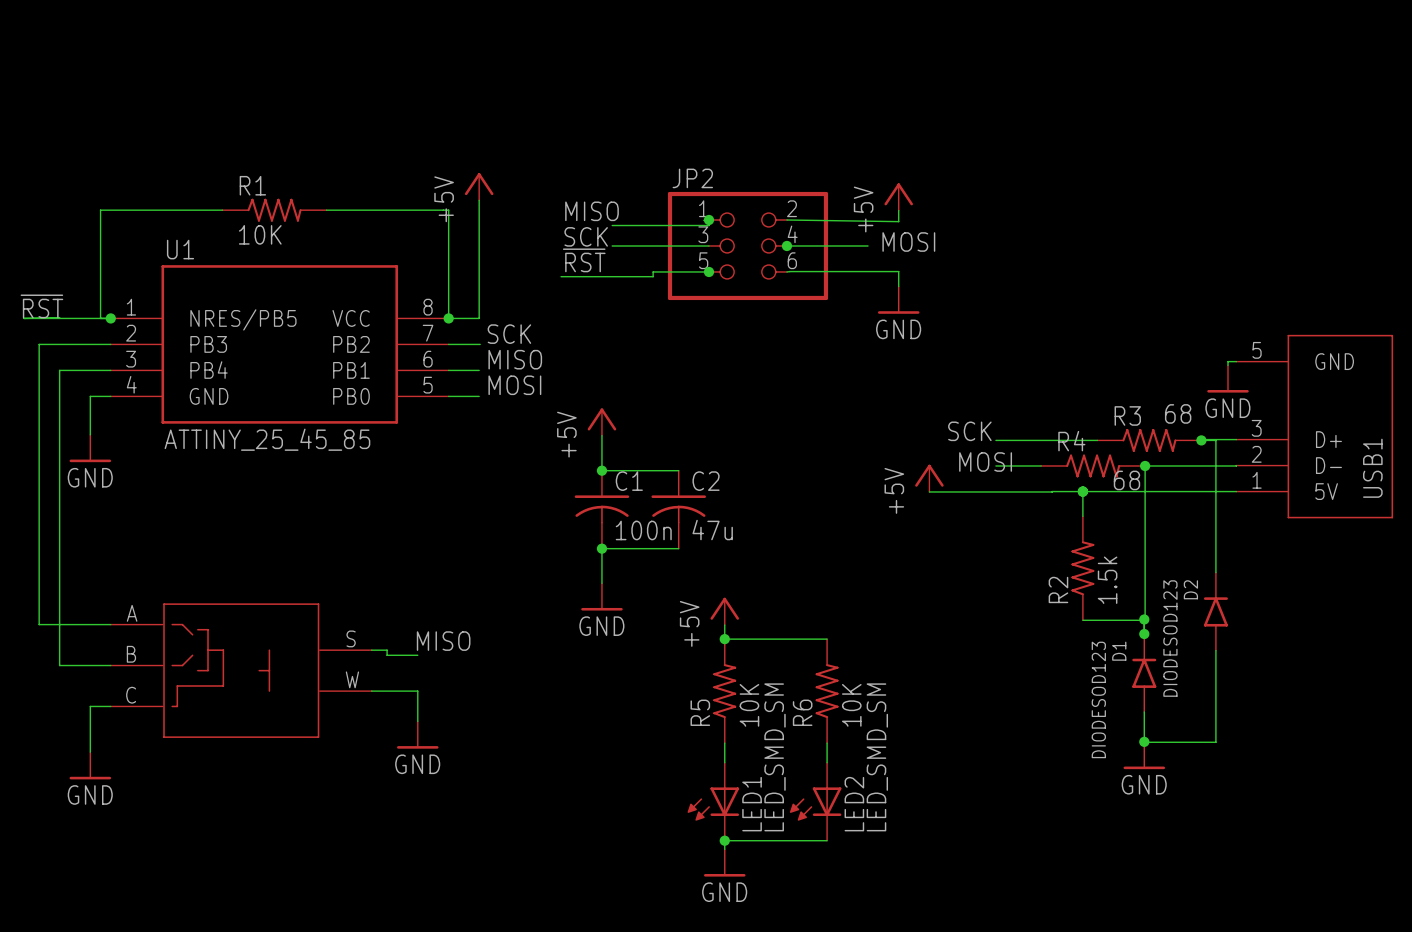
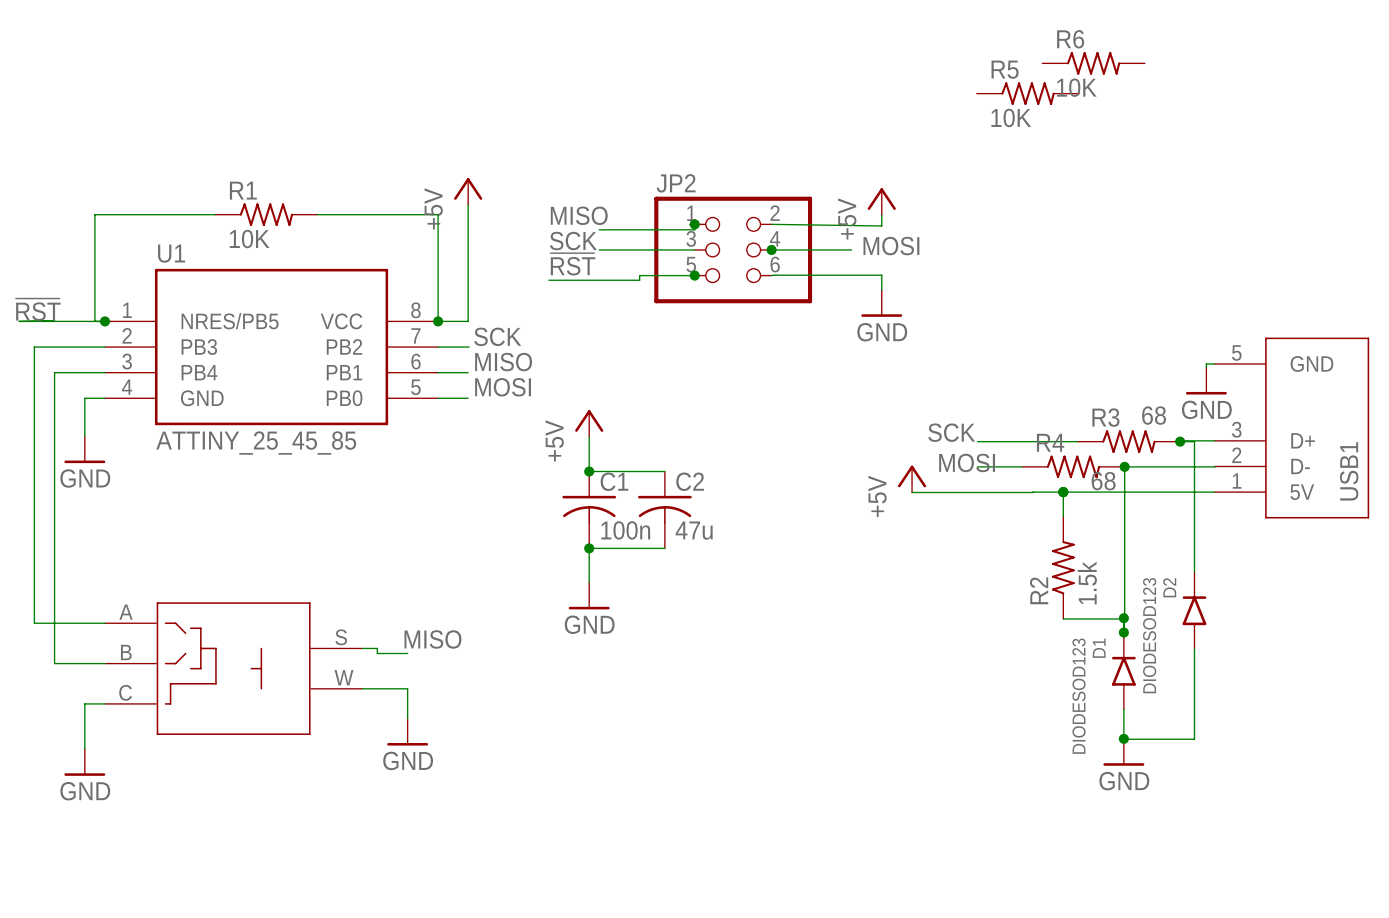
power symbol: +5V (724, 611) -> none
wire: (724, 625) (724, 639) (827, 639) -> none
junction: (724, 639) -> none
R5 rotation: 0° (724, 691) -> 90° clockwise (1028, 93)
R5 position: (724, 691) -> (1028, 93)
R6 rotation: 0° (827, 691) -> 90° clockwise (1093, 63)
R6 position: (827, 691) -> (1093, 63)
wire: (724, 743) (724, 762) -> none
wire: (827, 743) (827, 762) -> none
LED1: LED_SMD_SM (713, 801) -> none
LED2: LED_SMD_SM (815, 801) -> none
junction: (724, 840) -> none
wire: (827, 840) (724, 840) (724, 849) -> none
power symbol: GND (724, 862) -> none

